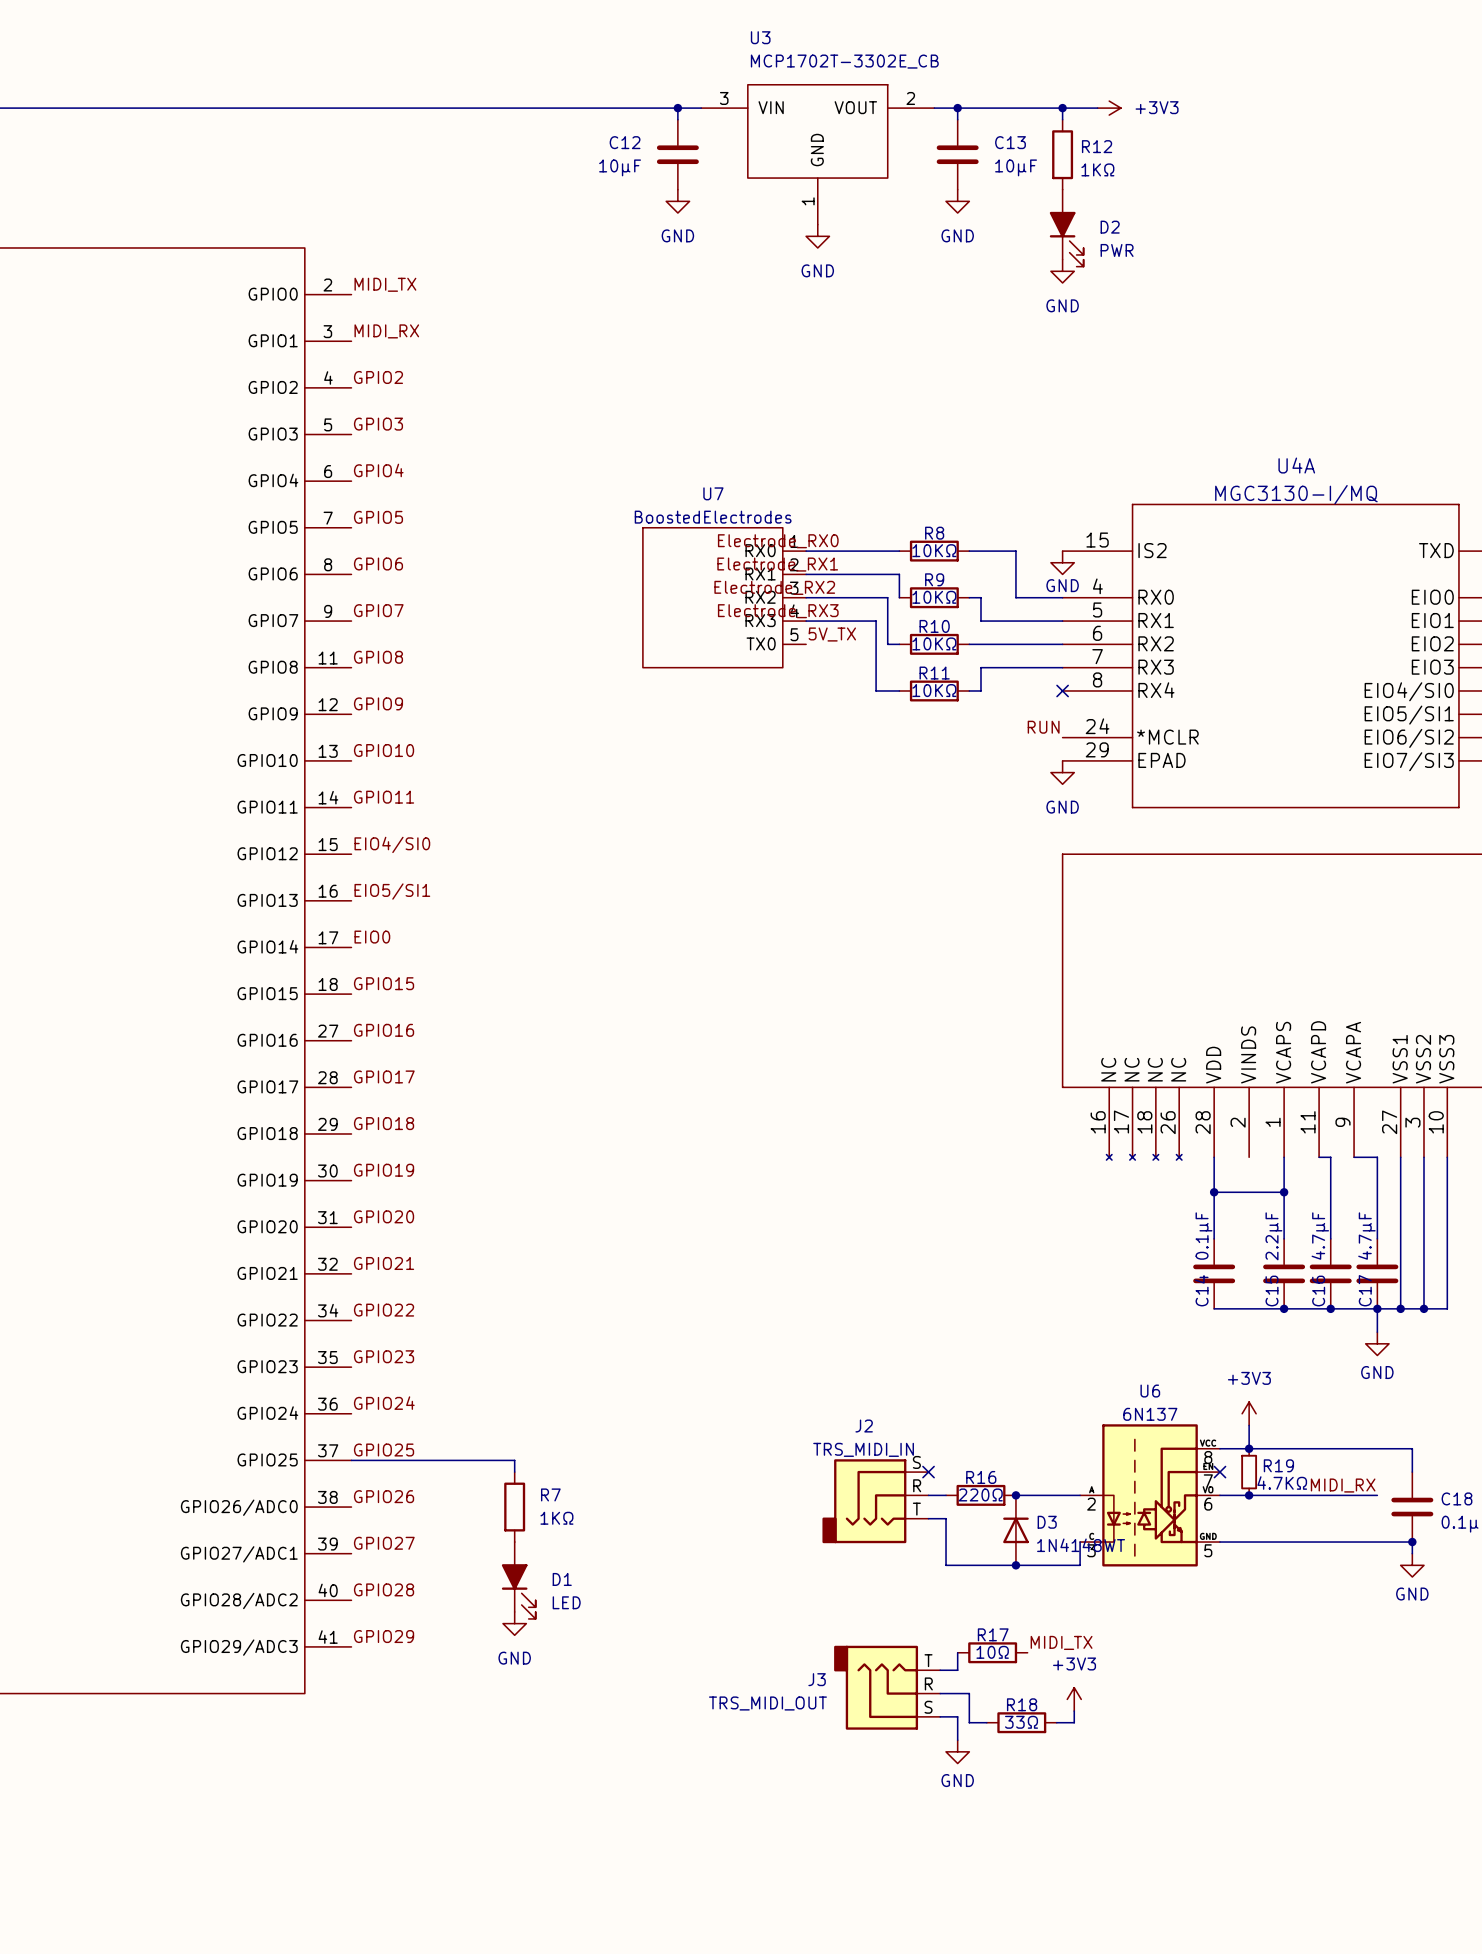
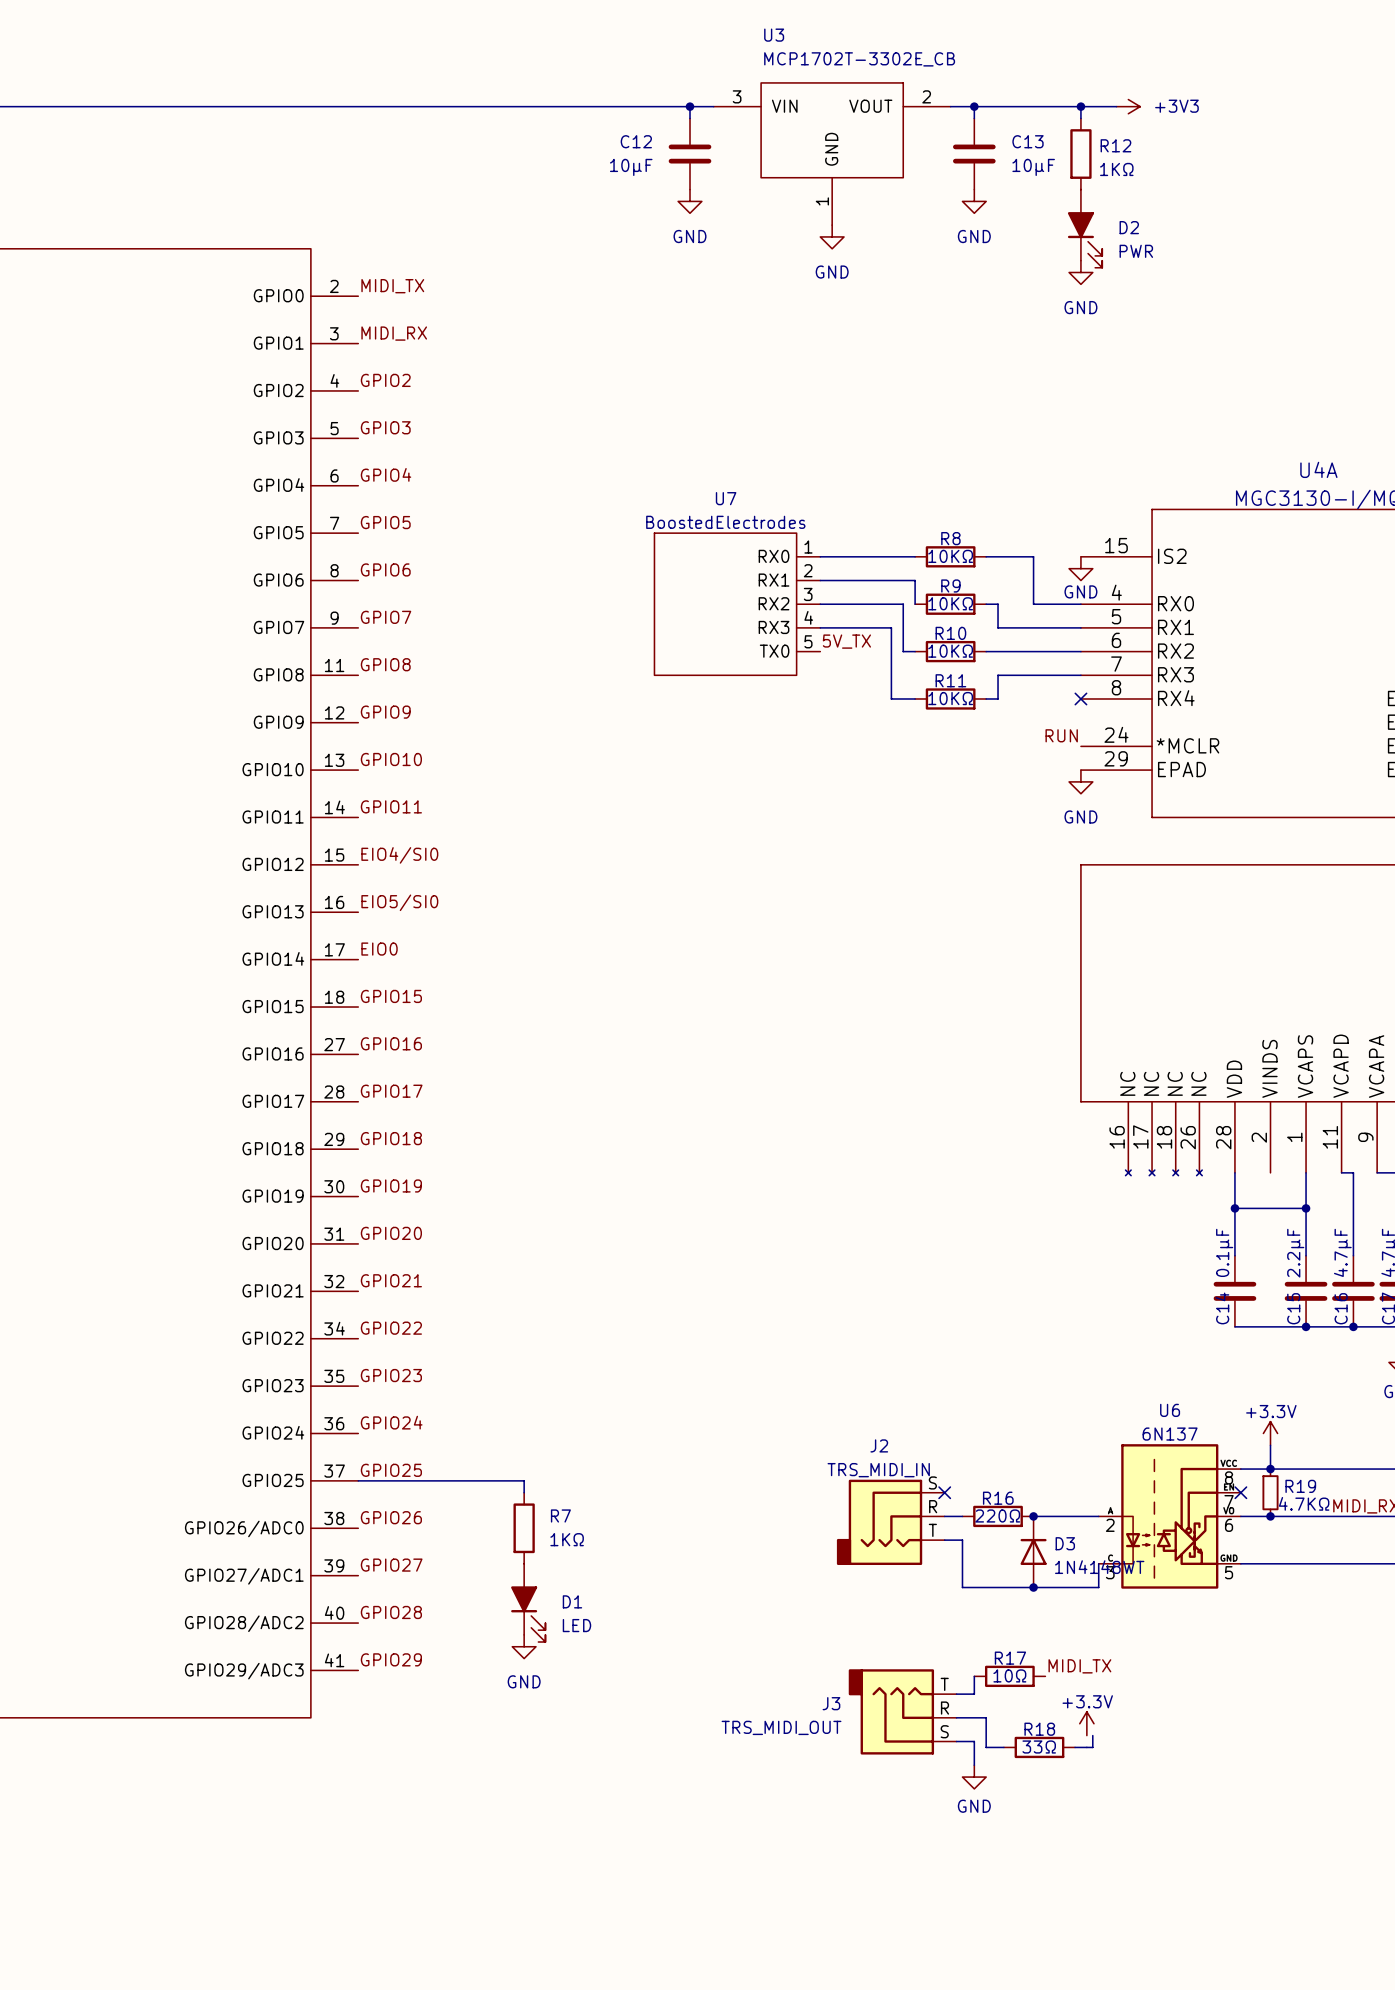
label: Electrode_RX0 (778, 541) -> none
label: Electrode_RX1 (777, 564) -> none
label: Electrode_RX2 (774, 587) -> none
label: Electrode_RX3 (778, 611) -> none
label: EIO5/SI1 (392, 891) -> EIO5/SI0 (399, 902)
power symbol: +3V3 (1249, 1413) -> +3.3V (1270, 1433)
power symbol: +3V3 (1074, 1699) -> +3.3V (1086, 1723)

